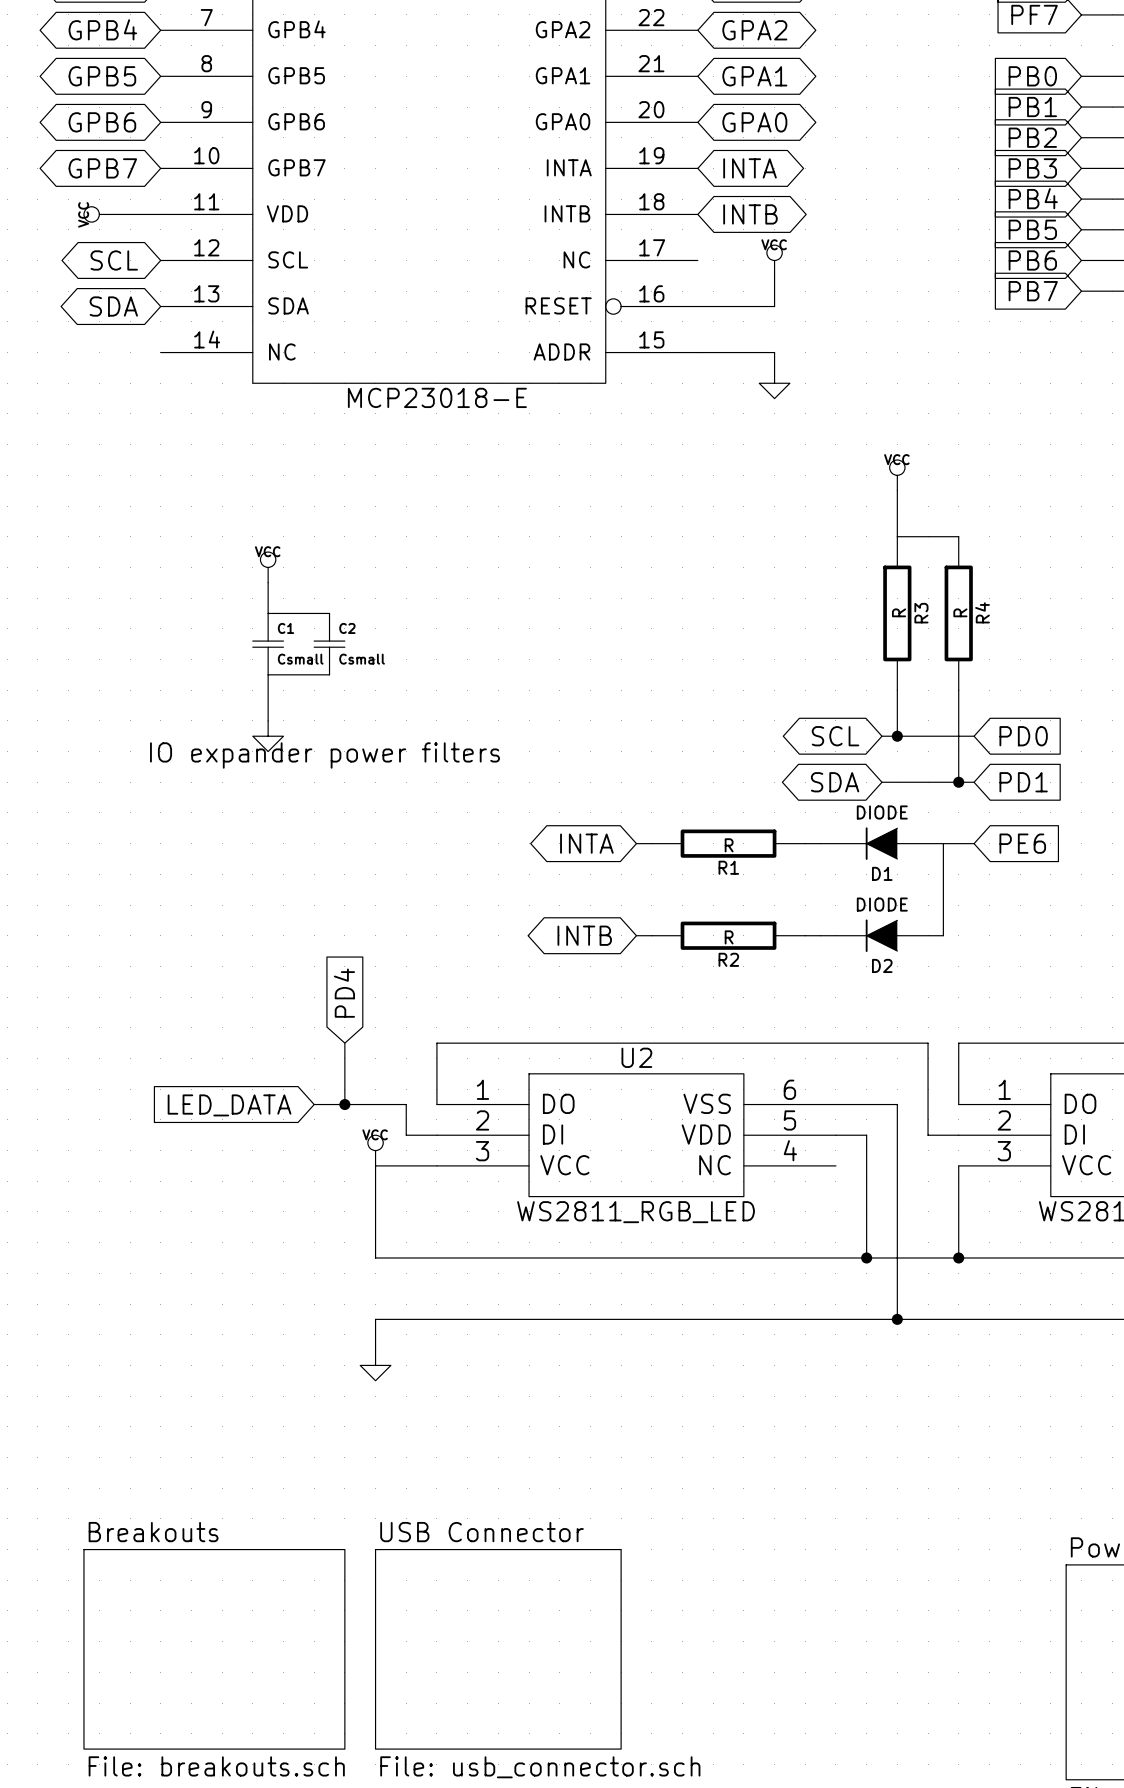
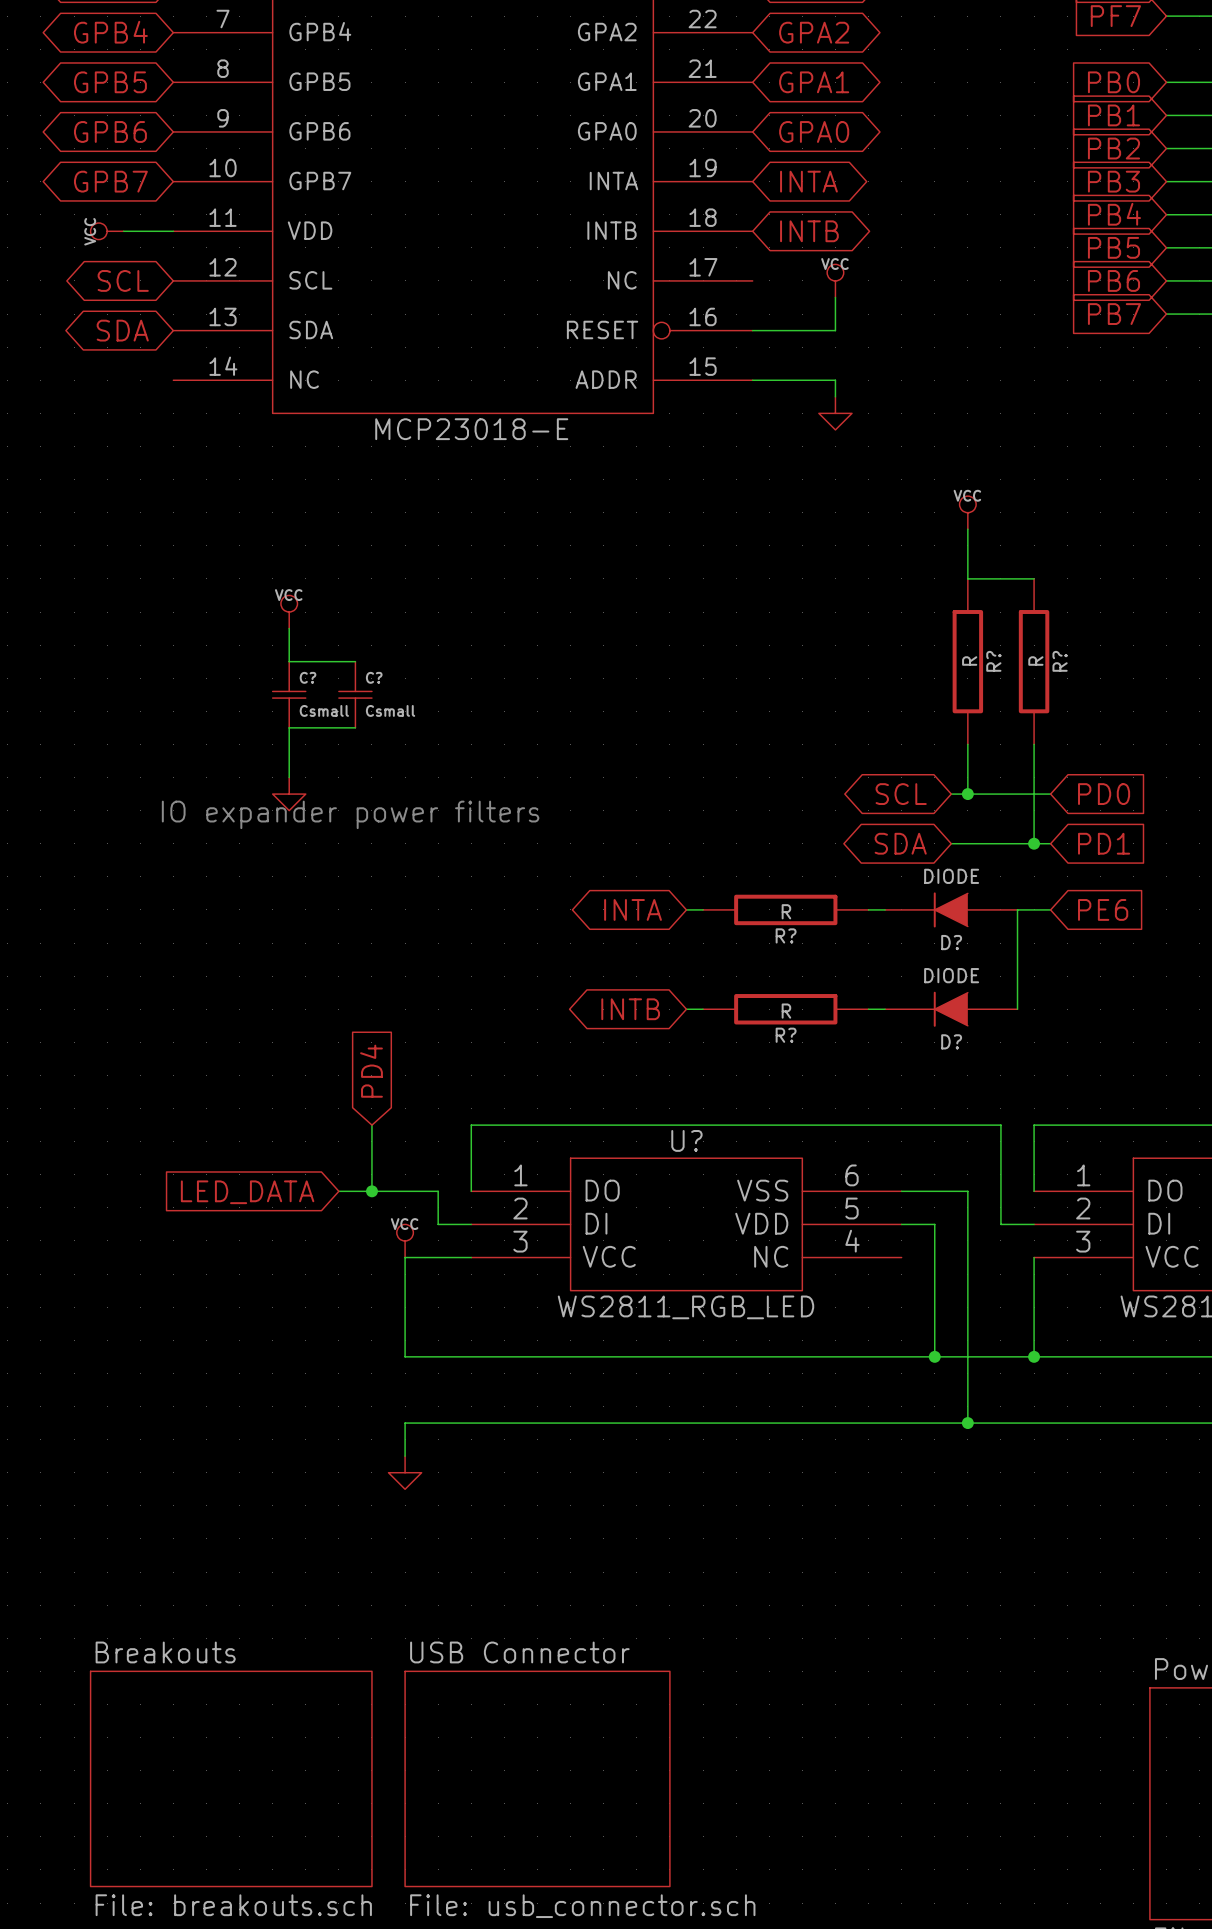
R4 name: R4 (982, 612) -> R? (1060, 661)
R3 name: R3 (921, 613) -> R? (993, 661)
C1 name: C1 (286, 628) -> C? (308, 677)
C2 name: C2 (347, 628) -> C? (374, 677)
R1 name: R1 (728, 867) -> R? (786, 935)
D1 name: D1 (882, 873) -> D? (951, 942)
R2 name: R2 (728, 959) -> R? (786, 1035)
D2 name: D2 (882, 965) -> D? (951, 1041)
U2 name: U2 (636, 1057) -> U? (686, 1140)

